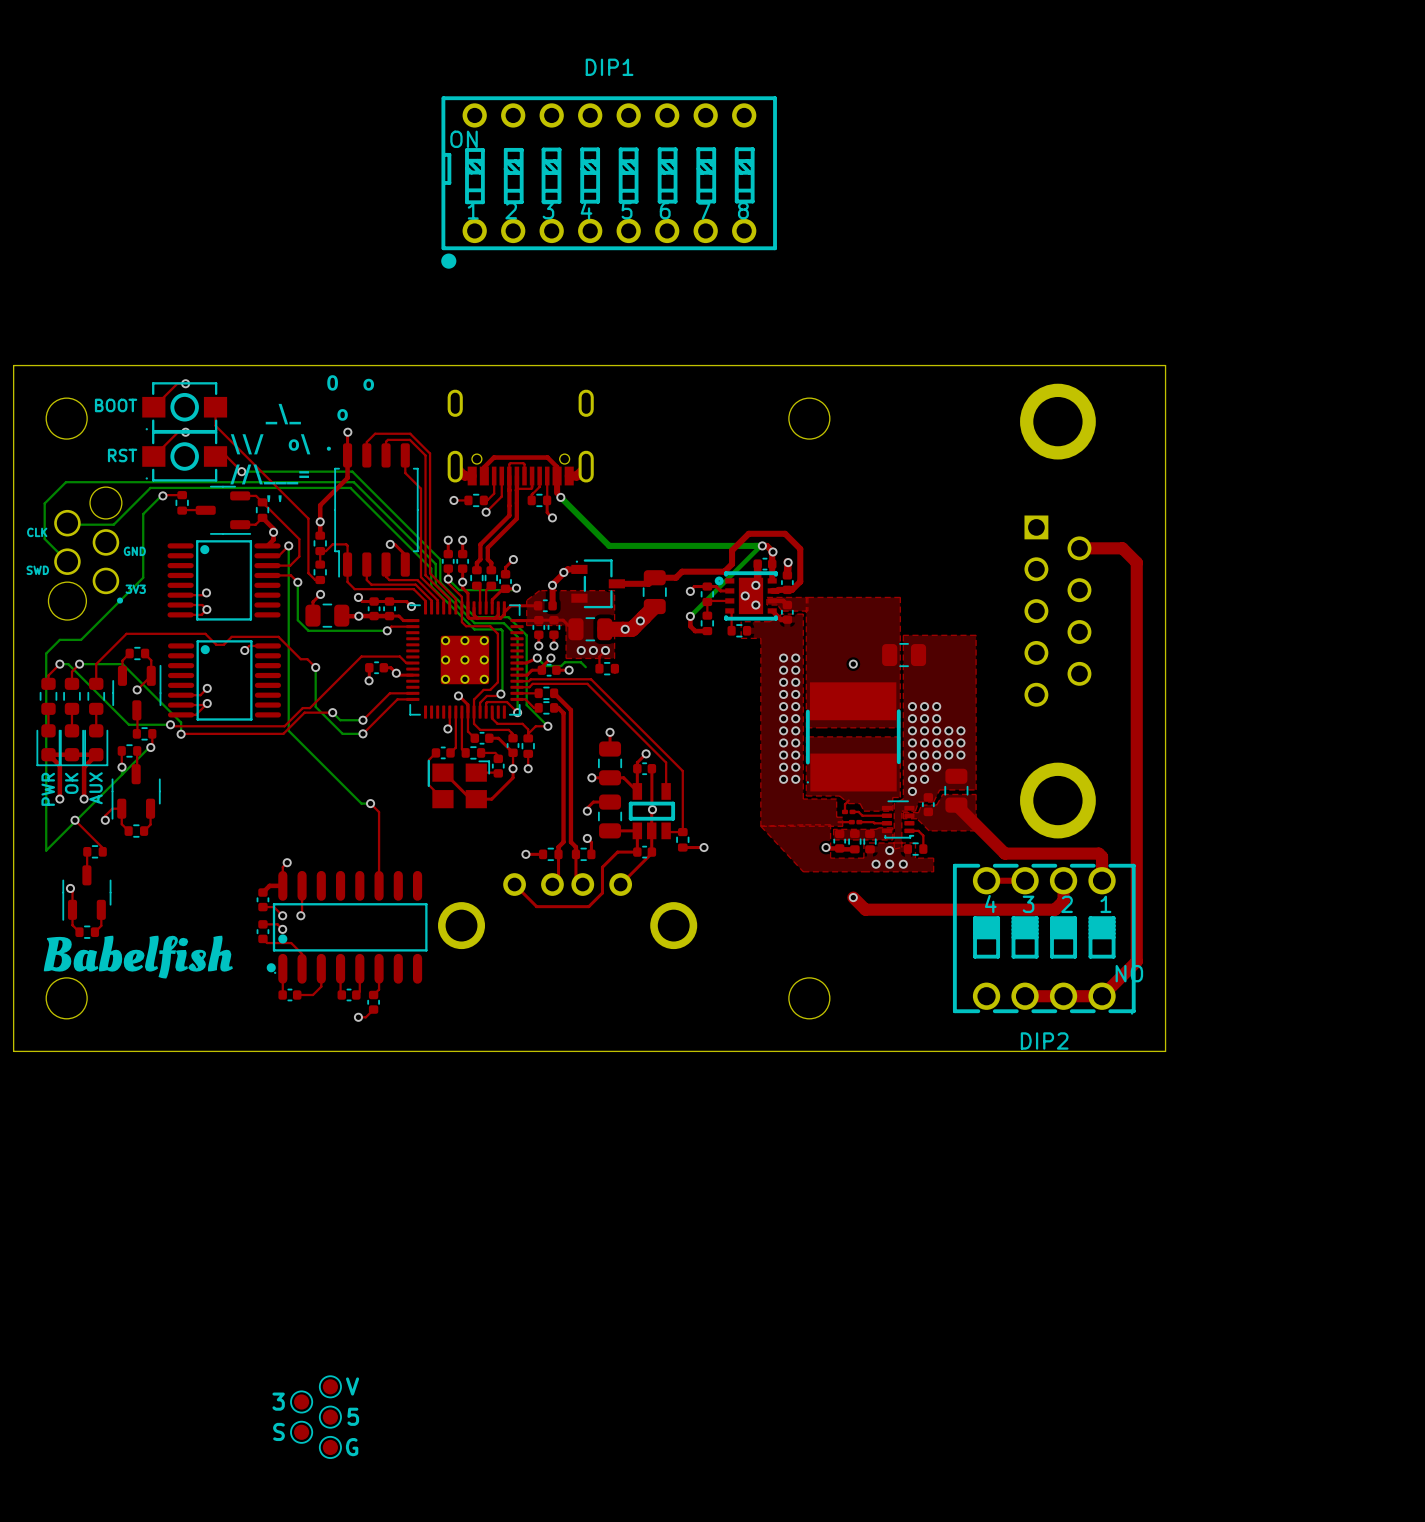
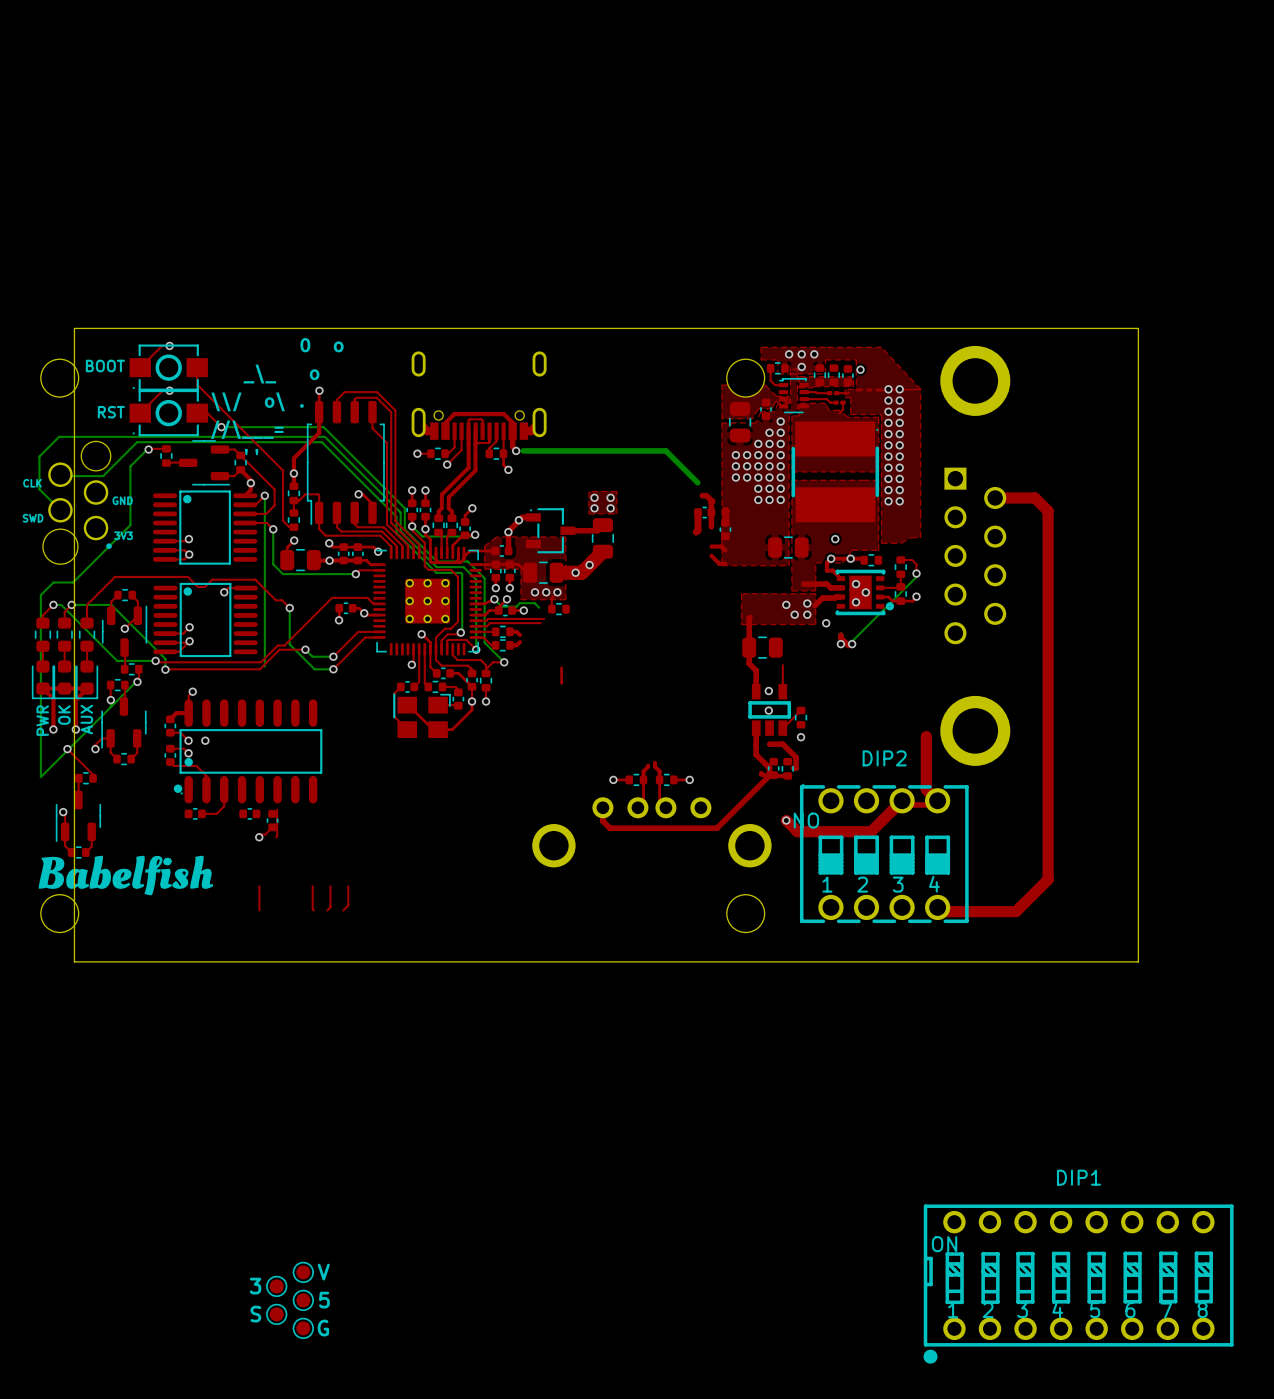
DIP1 position: (609, 182) -> (1078, 1284)
board edge: (13, 365) (1165, 365) (1165, 1051) (13, 1051) (13, 365) -> (74, 328) (1138, 328) (1138, 961) (74, 961) (74, 328)
via: none -> (789, 354)
via: none -> (801, 354)
via: none -> (814, 354)
via: none -> (801, 366)
top track: none -> (770, 368) (770, 380) (775, 385) (783, 385)
part: none -> (777, 368)
top zone outline: none -> (797, 368) (797, 410) (789, 414) (789, 565) (721, 565) (721, 422) (755, 422) (761, 411) (775, 411) (777, 403) (790, 403) (790, 369) (797, 368)
via: none -> (860, 369)
part: none -> (819, 375)
part: none -> (833, 375)
part: none -> (847, 375)
top zone outline: none -> (798, 376) (853, 376) (853, 386) (798, 387) (798, 376)
top zone outline: none -> (721, 385) (721, 418) (752, 418) (758, 408) (772, 408) (775, 401) (789, 401) (789, 396) (776, 396) (765, 385) (721, 385)
via: none -> (888, 389)
via: none -> (899, 389)
top zone outline: none -> (920, 389) (856, 390) (856, 359) (825, 359) (825, 373) (777, 373) (777, 359) (761, 359) (761, 347) (881, 347) (920, 389)
top zone outline: none -> (920, 389) (920, 537) (910, 537) (901, 543) (881, 543) (881, 414) (850, 414) (850, 397) (845, 397) (845, 389) (920, 389)
top track: none -> (804, 392) (829, 393)
part: none -> (833, 393)
top track: none -> (836, 393) (848, 393)
part: none -> (793, 395)
top track: none -> (804, 399) (826, 399) (830, 402) (836, 402)
via: none -> (888, 400)
via: none -> (899, 400)
top zone outline: none -> (798, 403) (798, 415) (791, 415) (791, 471) (878, 471) (878, 417) (847, 417) (839, 410) (829, 410) (825, 403) (798, 403)
part: none -> (839, 402)
top track: none -> (843, 402) (843, 409) (839, 413)
part: none -> (766, 409)
via: none -> (888, 411)
via: none -> (899, 411)
via: none -> (780, 421)
part: none -> (740, 422)
via: none -> (888, 422)
via: none -> (899, 422)
via: none -> (769, 432)
via: none -> (780, 432)
via: none -> (888, 434)
via: none -> (899, 434)
via: none -> (758, 443)
via: none -> (769, 443)
via: none -> (780, 443)
via: none -> (888, 445)
via: none -> (899, 445)
bottom track: (560, 497) (609, 545) (766, 545) (772, 551) -> none
bottom track: none -> (523, 450) (665, 450) (697, 482)
via: none -> (735, 455)
via: none -> (747, 455)
via: none -> (758, 455)
via: none -> (769, 455)
via: none -> (780, 455)
via: none -> (888, 456)
via: none -> (899, 456)
via: none -> (735, 466)
via: none -> (747, 466)
via: none -> (758, 466)
via: none -> (769, 466)
via: none -> (780, 466)
via: none -> (888, 467)
via: none -> (899, 467)
via: none -> (735, 477)
via: none -> (747, 477)
via: none -> (758, 477)
via: none -> (769, 477)
via: none -> (780, 477)
via: none -> (888, 478)
via: none -> (899, 478)
top zone outline: none -> (791, 480) (878, 480) (878, 550) (852, 550) (842, 562) (815, 562) (815, 590) (791, 590) (791, 480)
via: none -> (758, 488)
via: none -> (769, 488)
via: none -> (780, 488)
via: none -> (888, 490)
via: none -> (899, 490)
top zone outline: none -> (588, 491) (616, 491) (616, 513) (588, 513) (588, 491)
bottom track: (762, 545) (690, 616) -> none
via: (762, 545) -> none
via: none -> (594, 497)
via: none -> (610, 497)
via: none -> (758, 499)
via: none -> (769, 499)
via: none -> (780, 499)
via: (772, 551) -> none
via: none -> (888, 501)
via: none -> (899, 501)
via: none -> (594, 508)
via: none -> (610, 508)
via: (788, 562) -> none
top track: (654, 577) (675, 577) (682, 571) (724, 571) (732, 564) (732, 550) (748, 533) (785, 533) (800, 548) (800, 581) (792, 589) (772, 590) -> none
via: (755, 585) -> none
top track: (729, 590) (720, 590) (716, 586) (694, 586) (688, 592) -> none
via: (690, 591) -> none
via: none -> (835, 539)
part: (707, 594) -> none
via: (745, 595) -> none
part rotation: 0° (746, 595) -> 180° (864, 592)
part position: (746, 595) -> (864, 592)
top zone outline: (806, 597) (806, 727) (900, 727) (900, 597) (766, 597) (766, 605) (777, 605) (782, 611) (807, 611) (807, 597) -> none
top track: (729, 600) (708, 600) (707, 615) -> none
part: none -> (788, 547)
via: (755, 605) -> none
top track: (729, 610) (731, 612) (731, 630) -> none
part: (787, 612) -> none
via: none -> (831, 558)
via: none -> (850, 558)
top track: none -> (863, 560) (862, 558) (831, 558) (826, 562) (826, 570) (832, 570) (841, 577)
part: none -> (871, 560)
top track: none -> (900, 559) (912, 559) (916, 564) (916, 573)
top track: (690, 616) (690, 626) (695, 631) (707, 631) -> none
via: (690, 616) -> none
part: (707, 623) -> none
part: none -> (900, 567)
part: (739, 630) -> none
top track: none -> (900, 574) (899, 587) (880, 587)
via: none -> (916, 573)
bottom track: none -> (916, 577) (849, 645)
top zone outline: (903, 635) (903, 799) (894, 803) (894, 849) (901, 847) (901, 811) (915, 811) (918, 802) (933, 802) (939, 789) (976, 789) (976, 635) (903, 635) -> none
top track: none -> (803, 584) (826, 584) (830, 587) (840, 587)
via: none -> (856, 584)
via: none -> (865, 592)
top zone outline: none -> (741, 593) (741, 624) (815, 624) (815, 593) (741, 593)
part: none -> (900, 594)
top track: none -> (917, 595) (912, 601) (892, 601) (888, 597) (880, 597)
part: (904, 655) -> none
top track: none -> (840, 597) (822, 598) (815, 605)
via: none -> (916, 596)
via: (783, 658) -> none
via: (795, 658) -> none
via: none -> (856, 602)
via: none -> (807, 603)
via: (783, 670) -> none
via: (795, 670) -> none
via: none -> (794, 614)
via: none -> (807, 614)
top track: none -> (749, 617) (749, 663) (756, 670) (756, 691)
top track: (591, 679) (682, 771) (682, 832) (666, 830) -> none
via: (783, 682) -> none
via: (795, 682) -> none
top track: (587, 683) (666, 762) (666, 791) -> none
via: none -> (826, 623)
top track: (554, 693) (570, 710) (570, 842) (575, 847) (575, 877) (582, 884) -> (509, 631) (516, 631) (520, 635)
via: (783, 694) -> none
via: (795, 694) -> none
top track: none -> (840, 635) (840, 637) (848, 645)
via: (783, 706) -> none
via: (795, 706) -> none
via: (936, 706) -> none
top track: (558, 707) (563, 713) (563, 842) (558, 847) (558, 854) (558, 878) (552, 884) (560, 876) -> (513, 645) (520, 642)
part: none -> (762, 647)
via: (783, 718) -> none
via: (795, 718) -> none
via: (912, 718) -> none
via: (924, 718) -> none
via: (936, 718) -> none
top track: none -> (782, 665) (782, 691)
bottom track: (288, 730) (361, 803) (370, 803) -> none
via: (783, 730) -> none
via: (795, 730) -> none
via: (912, 730) -> none
via: (924, 730) -> none
via: (936, 730) -> none
via: (948, 730) -> none
via: (960, 730) -> none
via: (610, 732) -> none
top zone outline: (806, 736) (806, 796) (839, 796) (848, 803) (860, 803) (863, 811) (892, 811) (892, 797) (900, 797) (900, 736) (806, 736) -> none
part rotation: 0° (853, 736) -> 180° (835, 471)
part position: (853, 736) -> (835, 471)
via: (783, 742) -> none
via: (795, 742) -> none
via: (912, 742) -> none
via: (924, 742) -> none
via: (936, 742) -> none
via: (948, 742) -> none
via: (960, 742) -> none
top track: (646, 753) (637, 762) (637, 791) (623, 777) (591, 777) -> none
via: (646, 753) -> none
via: (783, 755) -> none
via: (795, 755) -> none
via: (912, 755) -> none
via: (924, 755) -> none
via: (936, 755) -> none
via: (948, 755) -> none
via: (960, 755) -> none
via: none -> (768, 691)
via: none -> (192, 691)
part: (610, 763) -> none
via: (783, 767) -> none
via: (795, 767) -> none
via: (912, 767) -> none
via: (924, 767) -> none
via: (936, 767) -> none
part: (644, 768) -> none
top track: (651, 768) (651, 851) -> none
via: (591, 777) -> none
via: none -> (768, 710)
top track: none -> (801, 710) (782, 728)
via: (783, 779) -> none
via: (795, 779) -> none
via: (912, 779) -> none
via: (924, 779) -> none
part: none -> (801, 717)
part: (956, 790) -> none
via: (912, 791) -> none
top zone outline: (942, 794) (936, 805) (921, 805) (918, 812) (903, 812) (903, 818) (916, 818) (929, 830) (976, 830) (976, 794) (942, 794) -> none
part: none -> (170, 725)
top track: none -> (756, 728) (756, 754) (769, 768) (769, 775) (717, 828) (609, 828) (602, 821) (602, 807)
top track: (848, 800) (844, 804) (844, 811) -> none
top track: (610, 802) (593, 802) (587, 808) -> none
top track: (370, 803) (379, 812) (379, 885) -> none
via: (370, 803) -> none
part: (928, 804) -> none
top track: (956, 805) (1004, 853) (1098, 853) (1102, 856) (1102, 880) -> none
top track: none -> (926, 736) (926, 789) (937, 800)
via: none -> (801, 737)
via: (652, 809) -> none
via: none -> (188, 740)
via: none -> (205, 740)
via: (587, 811) -> none
part position: (651, 811) -> (769, 709)
part: (848, 811) -> none
top track: (852, 811) (858, 811) (862, 815) (886, 815) -> none
top track: none -> (769, 744) (782, 744) (796, 757) (796, 768) (793, 768)
part: (610, 816) -> none
part: (898, 819) -> none
top track: (838, 822) (851, 822) -> none
part: (855, 822) -> none
top track: (859, 822) (886, 823) -> none
via: none -> (188, 753)
top zone outline: (760, 826) (830, 824) (830, 858) (863, 858) (863, 842) (915, 842) (915, 858) (933, 858) (933, 871) (803, 871) (760, 826) -> none
top zone outline: (760, 826) (760, 638) (741, 638) (741, 621) (769, 621) (782, 614) (803, 614) (803, 799) (836, 799) (836, 817) (842, 817) (842, 826) (760, 826) -> none
part: none -> (170, 755)
top zone outline: (879, 827) (892, 827) (892, 839) (833, 839) (833, 829) (879, 827) -> none
top track: (610, 830) (637, 830) (637, 852) (617, 852) (602, 867) (602, 893) (588, 906) (536, 906) (514, 884) -> none
top track: (909, 830) (918, 830) (923, 835) (923, 849) -> none
top track: none -> (654, 762) (654, 766) (659, 771) (659, 801) (665, 807)
top track: (587, 838) (591, 842) (591, 854) -> none
via: (587, 838) -> none
top track: none -> (648, 765) (643, 771) (643, 779) (643, 802) (637, 807) (644, 800)
part rotation: 0° (682, 839) -> 90° clockwise (636, 779)
part position: (682, 839) -> (636, 779)
part: (869, 841) -> none
top track: (682, 847) (704, 847) -> none
via: (704, 847) -> none
via: (826, 847) -> none
part: (915, 849) -> none
via: (889, 850) -> none
part: (644, 852) -> none
top track: (651, 852) (620, 884) -> none
via: none -> (613, 779)
part: none -> (666, 779)
top track: none -> (673, 779) (689, 779)
via: none -> (689, 779)
top track: (525, 854) (543, 854) -> (613, 779) (629, 779)
via: (525, 854) -> none
part: (550, 854) -> none
part: (583, 854) -> none
top track: (287, 862) (282, 867) (282, 885) (269, 885) (262, 892) -> (192, 691) (188, 695) (188, 713) (176, 713) (170, 719)
via: (287, 862) -> none
via: (876, 864) -> none
via: (889, 864) -> none
via: (903, 864) -> none
top track: (1063, 880) (1063, 901) (1054, 909) (945, 909) -> (902, 800) (871, 831)
part: none -> (195, 813)
part: none -> (272, 820)
part rotation: 0° (262, 899) -> 90° clockwise (249, 813)
top track: (262, 907) (274, 907) (282, 915) -> (170, 732) (180, 732) (188, 740)
part position: (567, 911) -> (651, 832)
via: (300, 915) -> none
top track: (262, 924) (277, 924) (282, 929) -> (170, 748) (183, 748) (188, 753)
part position: (347, 927) -> (248, 751)
via: (282, 929) -> none
part: (262, 931) -> none
top track: (262, 938) (267, 943) (291, 943) (302, 953) (302, 968) -> (170, 762) (174, 765) (196, 765) (206, 775) (206, 789)
DIP2 rotation: 0° (1044, 939) -> 180° (884, 853)
top track: (321, 968) (321, 986) (312, 994) (297, 994) -> (224, 789) (224, 806) (216, 813) (201, 813)
part: (289, 994) -> none
part: (349, 994) -> none
part: (373, 1002) -> none
top track: (373, 1009) (365, 1017) (358, 1017) -> (272, 827) (265, 834) (258, 834)
via: (358, 1017) -> none

